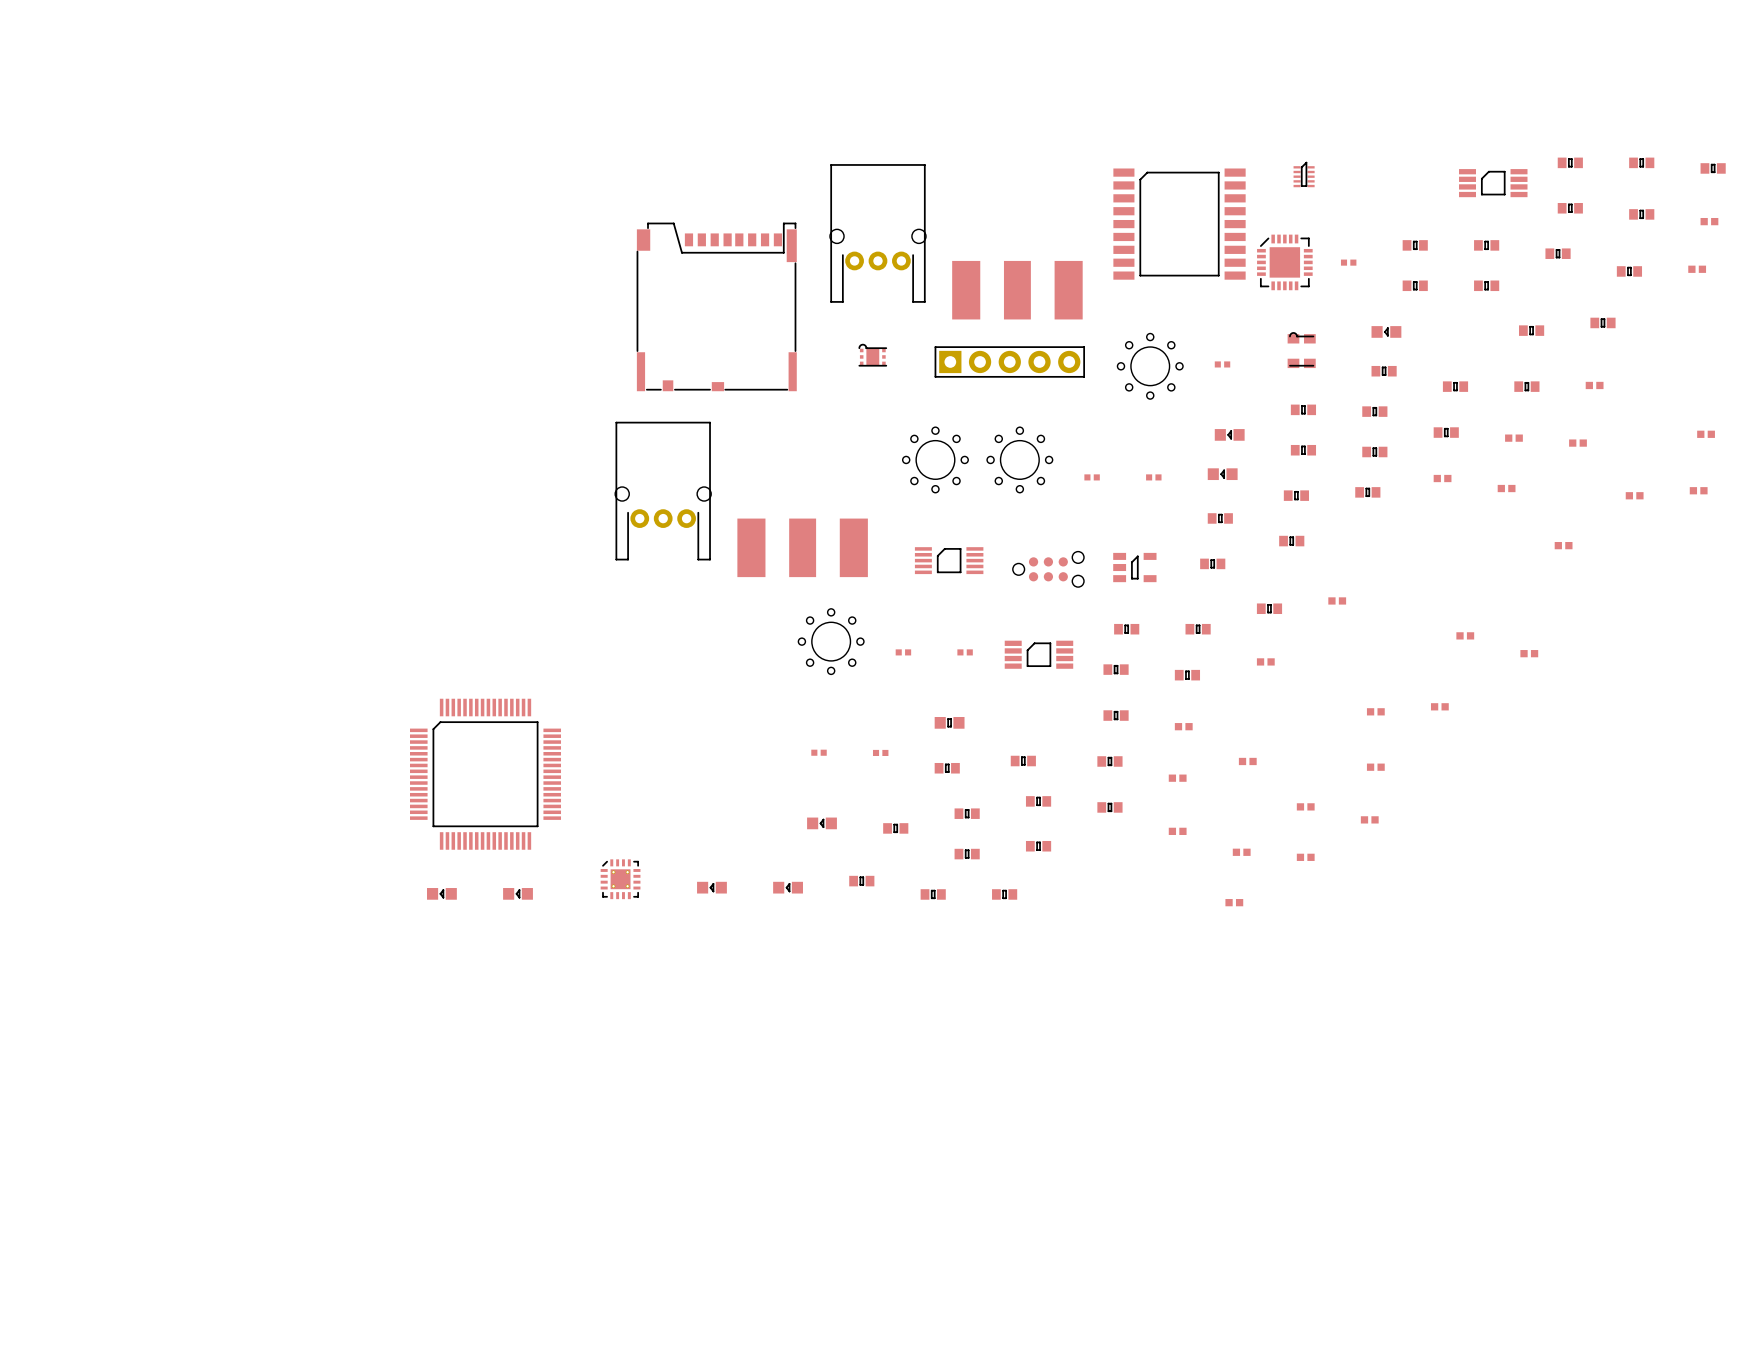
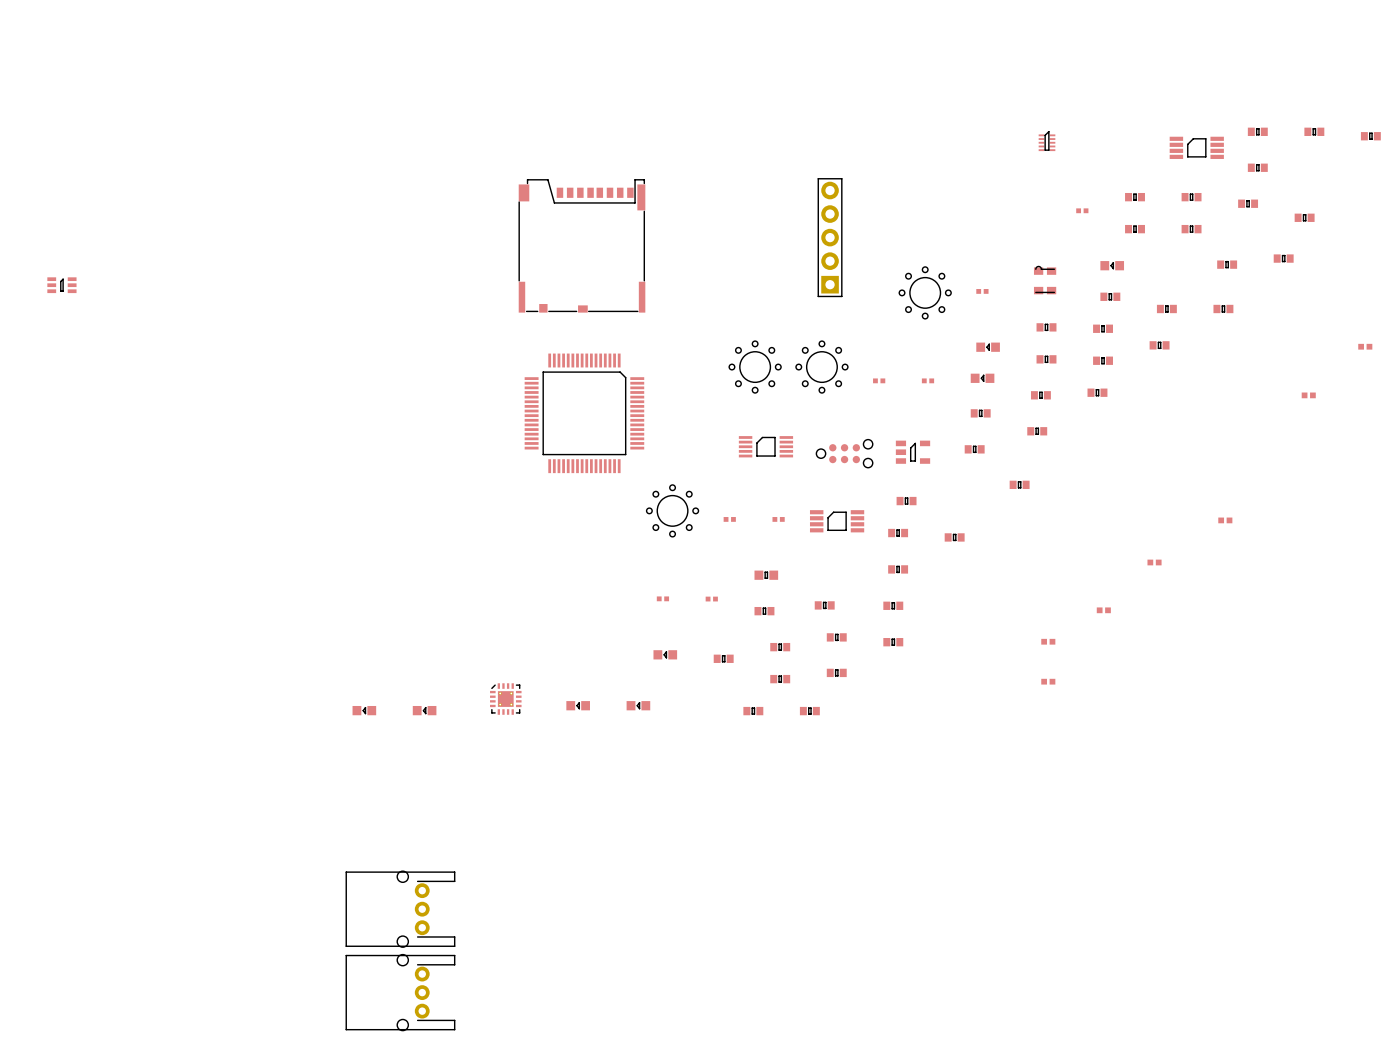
part: (1641, 214) -> none
part: (1709, 221) -> none
part: (1179, 224) -> none
part: (877, 233) -> none
part: (1284, 262) -> none
part: (1697, 269) -> none
part: (1017, 290) -> none
part: (872, 355) -> none
part: none -> (61, 285)
part rotation: 0° (1009, 361) -> 90° counterclockwise (830, 237)
part: (1594, 385) -> none
part: (1513, 438) -> none
part: (1577, 443) -> none
part: (1442, 478) -> none
part: (1506, 488) -> none
part: (1698, 490) -> none
part: (663, 491) -> none
part: none -> (584, 413)
part: (1563, 545) -> none
part: (802, 547) -> none
part: (1337, 600) -> none
part: (1198, 629) -> none
part: (1465, 635) -> none
part: (1265, 661) -> none
part: (1375, 711) -> none
part: (1183, 726) -> none
part: (1247, 761) -> none
part: (485, 774) -> none
part: (1177, 778) -> none
part: (1369, 819) -> none
part: (1177, 831) -> none
part: (1241, 852) -> none
part: (861, 881) -> none
part: (1234, 902) -> none
part: none -> (400, 909)
part: none -> (400, 992)

